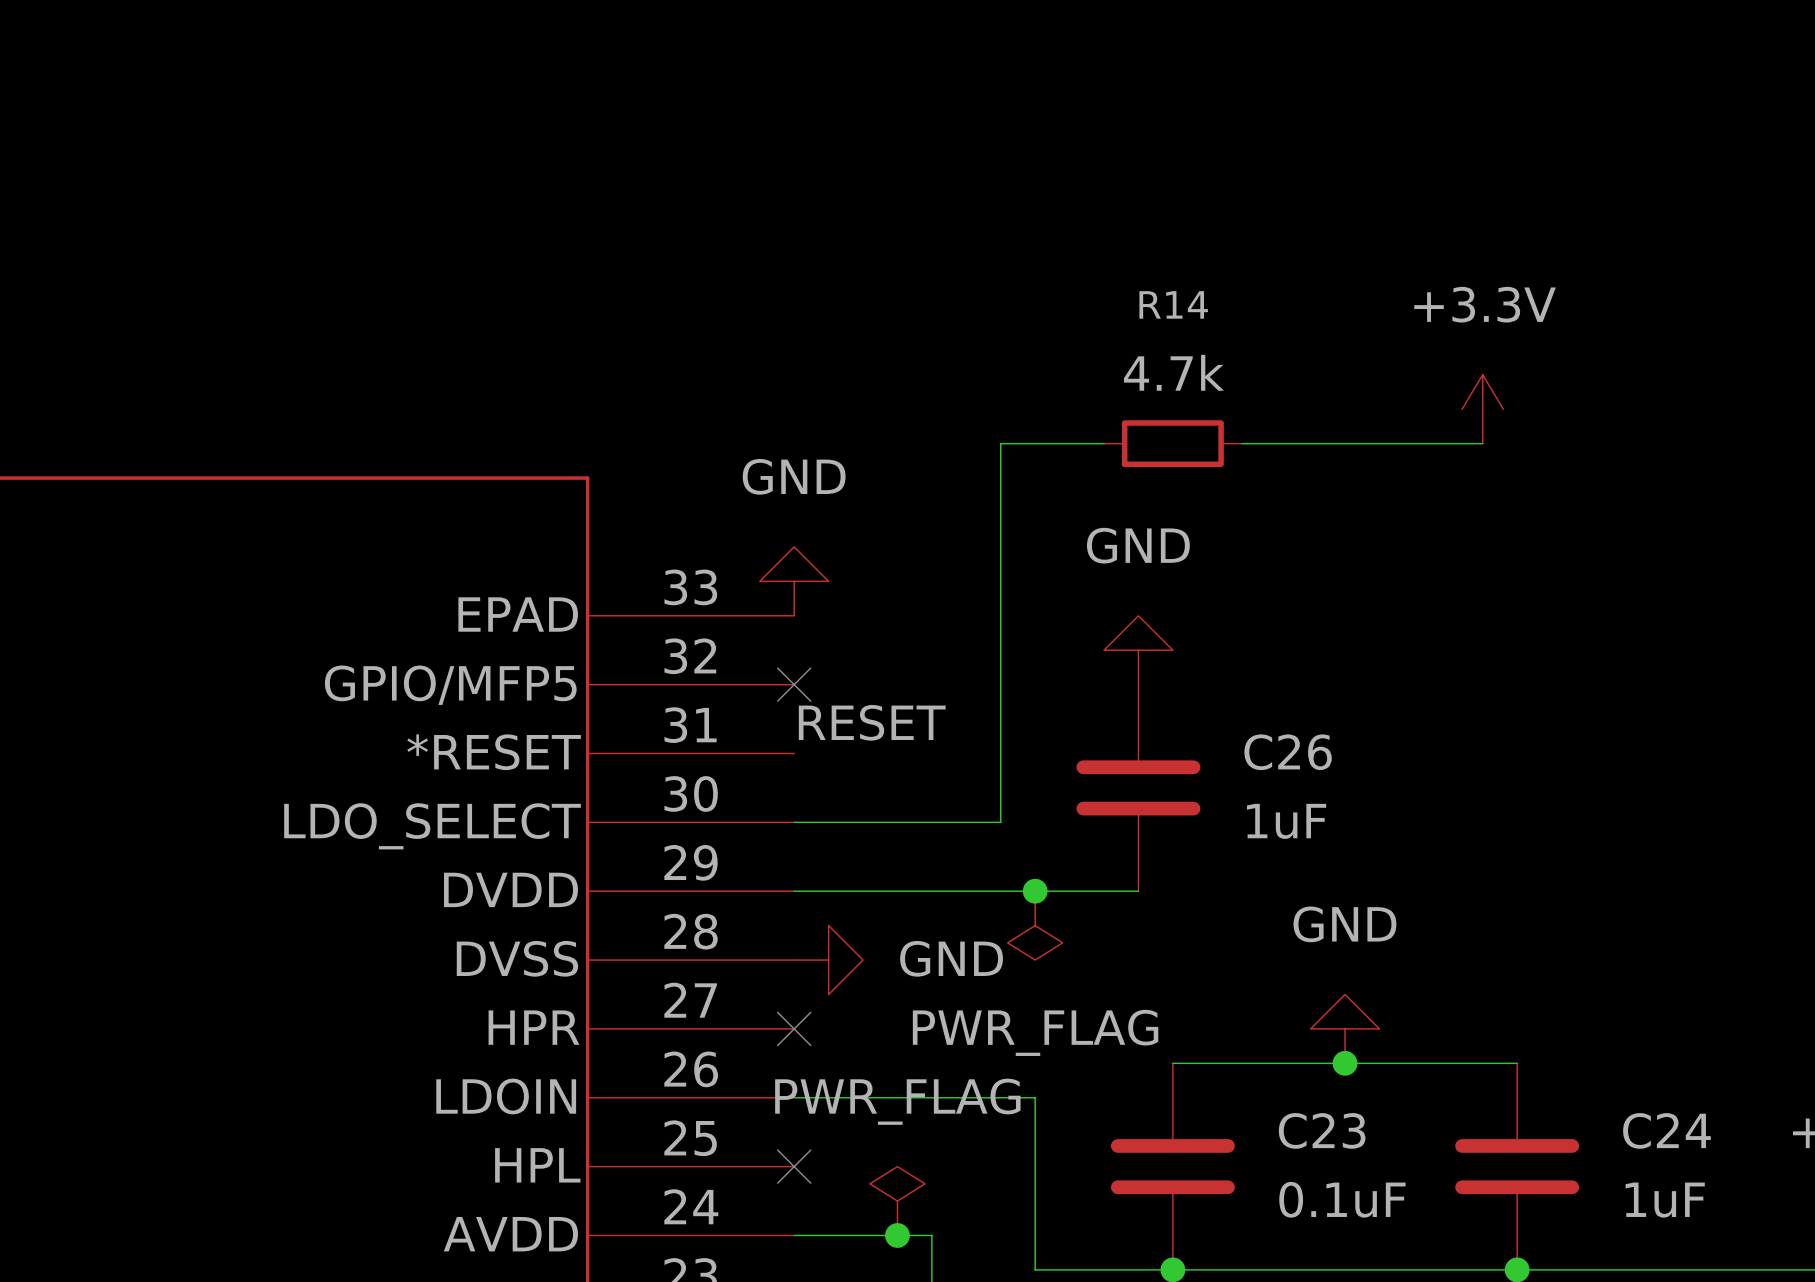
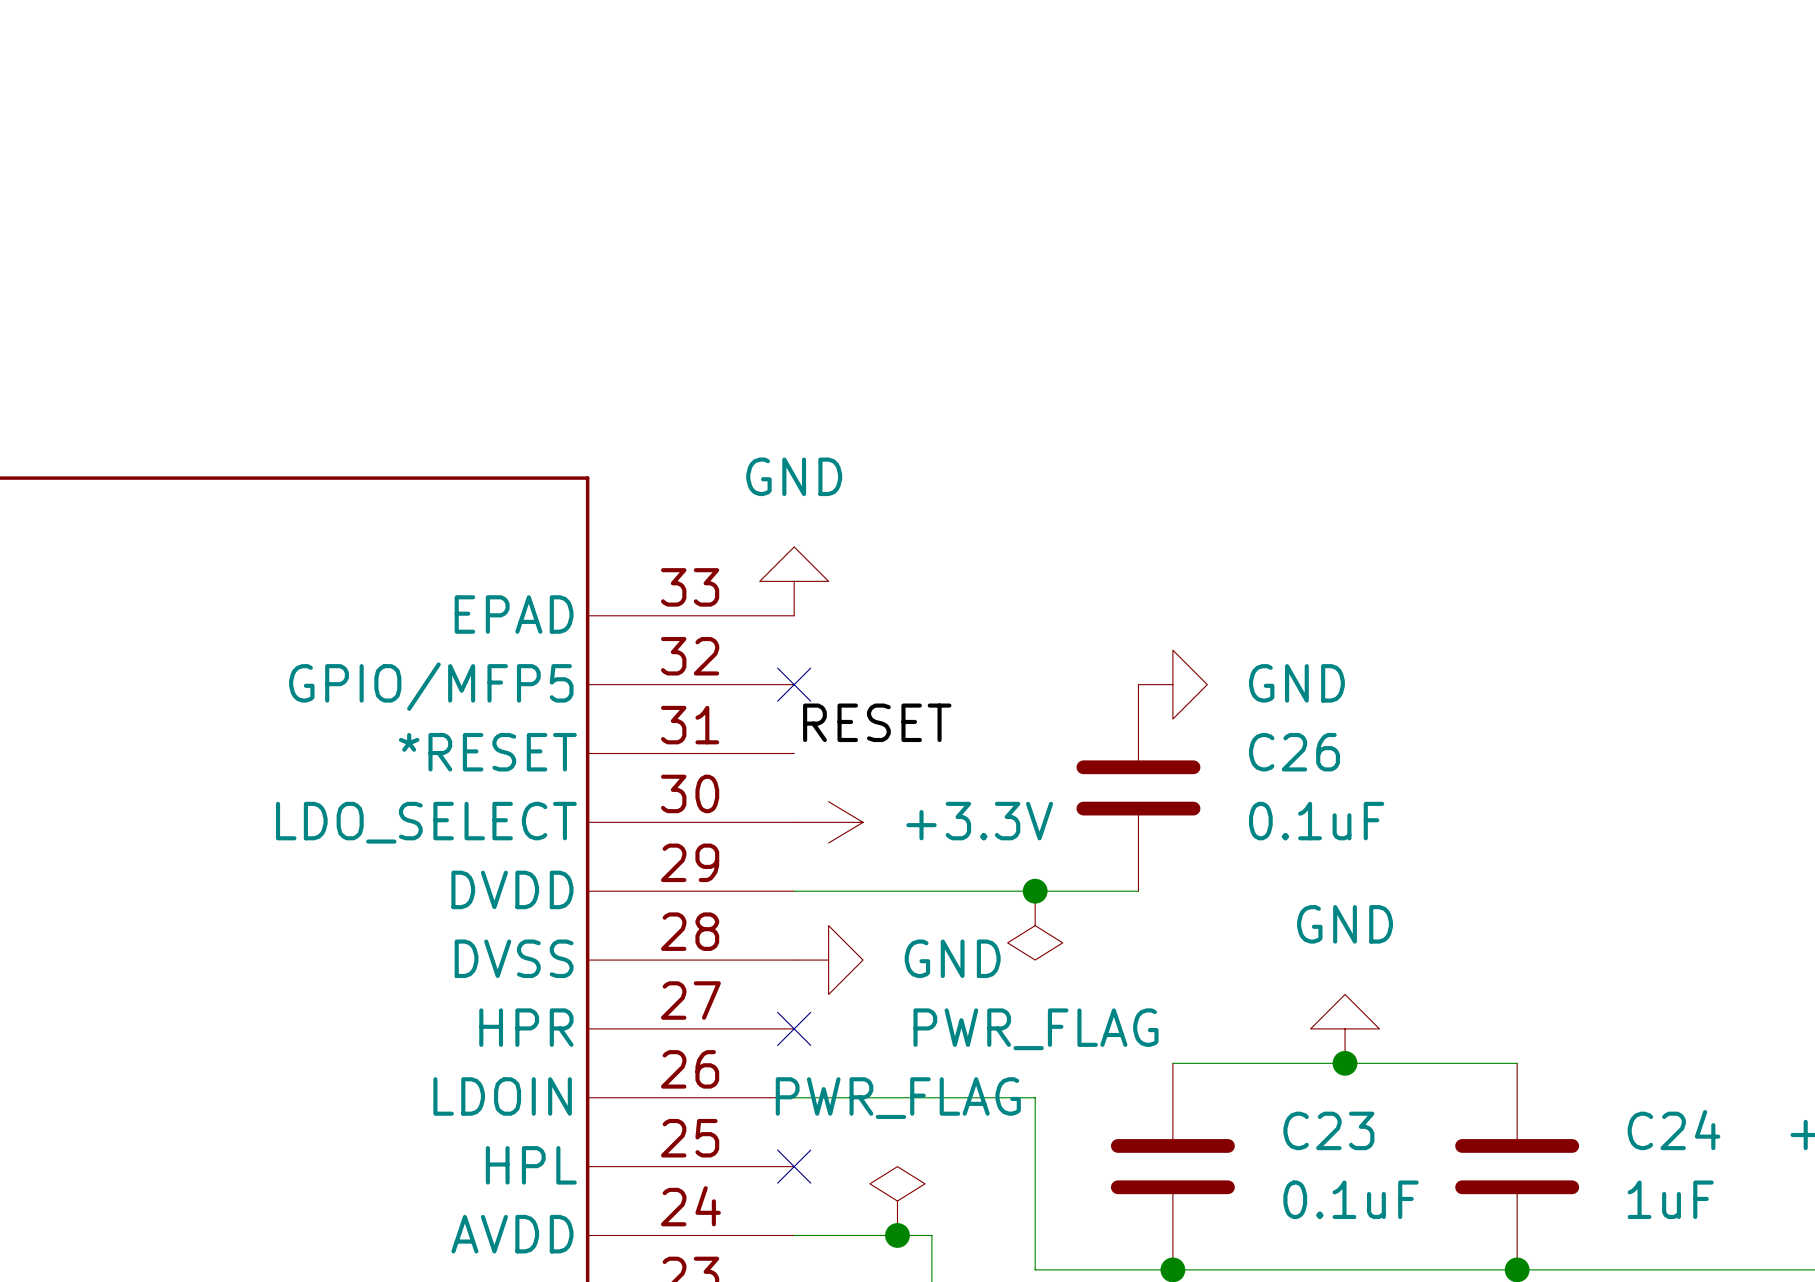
power symbol: +3.3V (1482, 409) -> none
wire: (1104, 443) (1000, 443) (1000, 822) (794, 822) -> none
R14: 4.7k (1172, 443) -> none
wire: (1241, 443) (1482, 443) -> none
power symbol rotation: 0° (1138, 650) -> 90° clockwise (1172, 684)
power symbol position: GND (1138, 650) -> GND (1172, 684)
C26 value: 1uF (1286, 821) -> 0.1uF (1316, 821)
power symbol: none -> +3.3V (828, 822)

